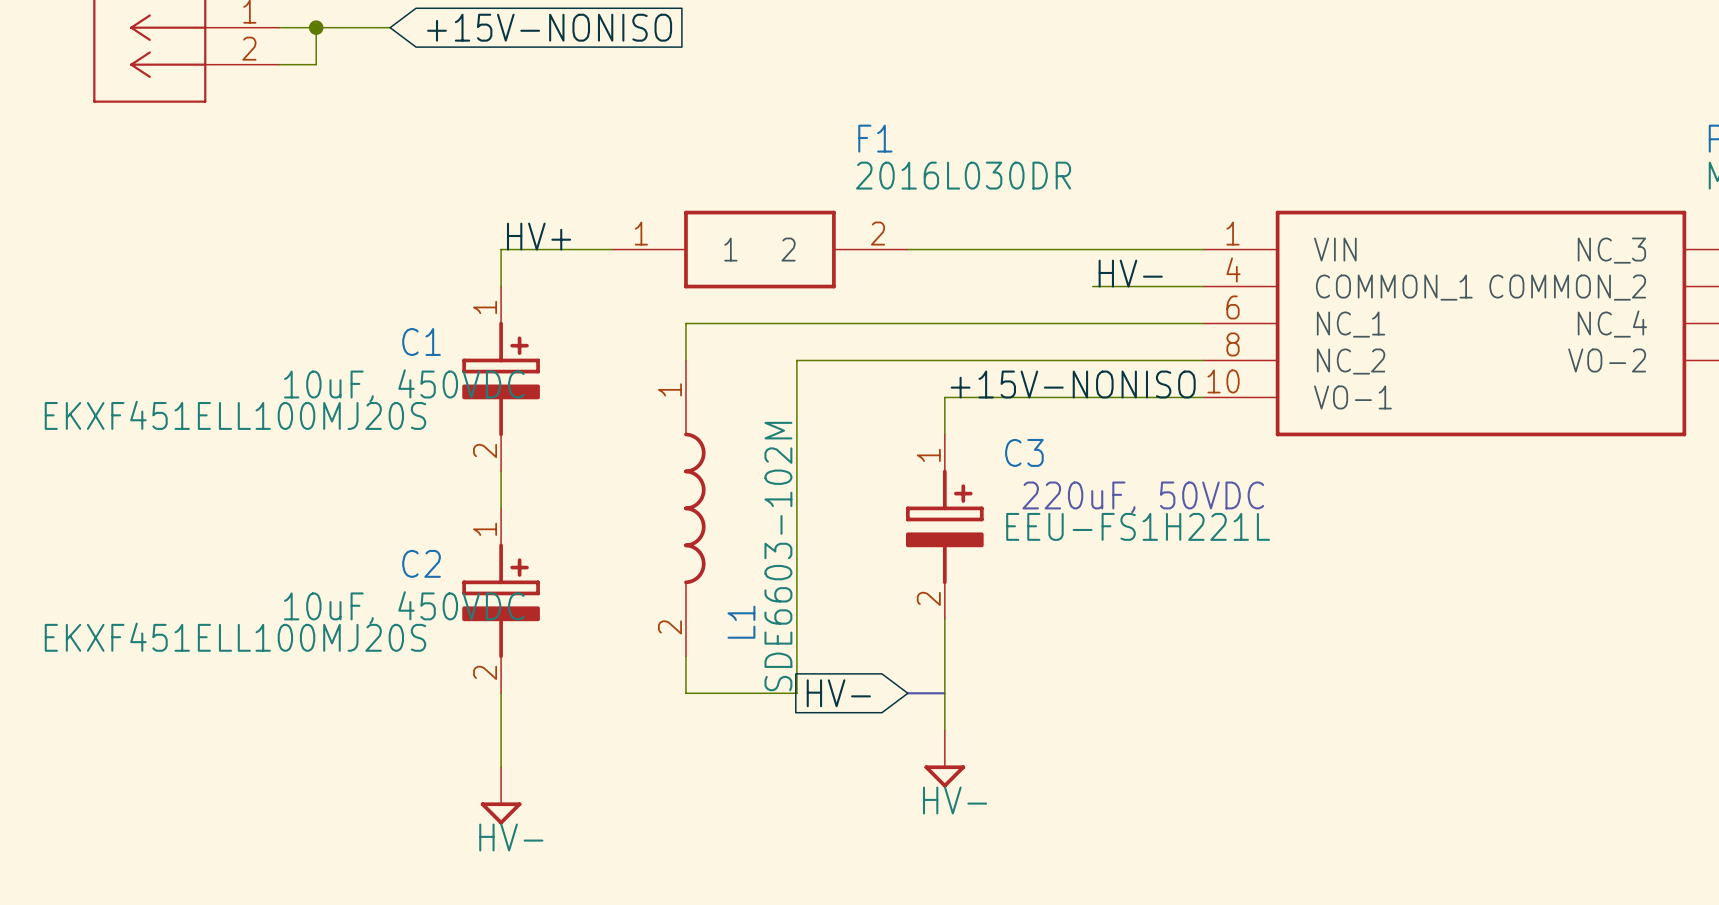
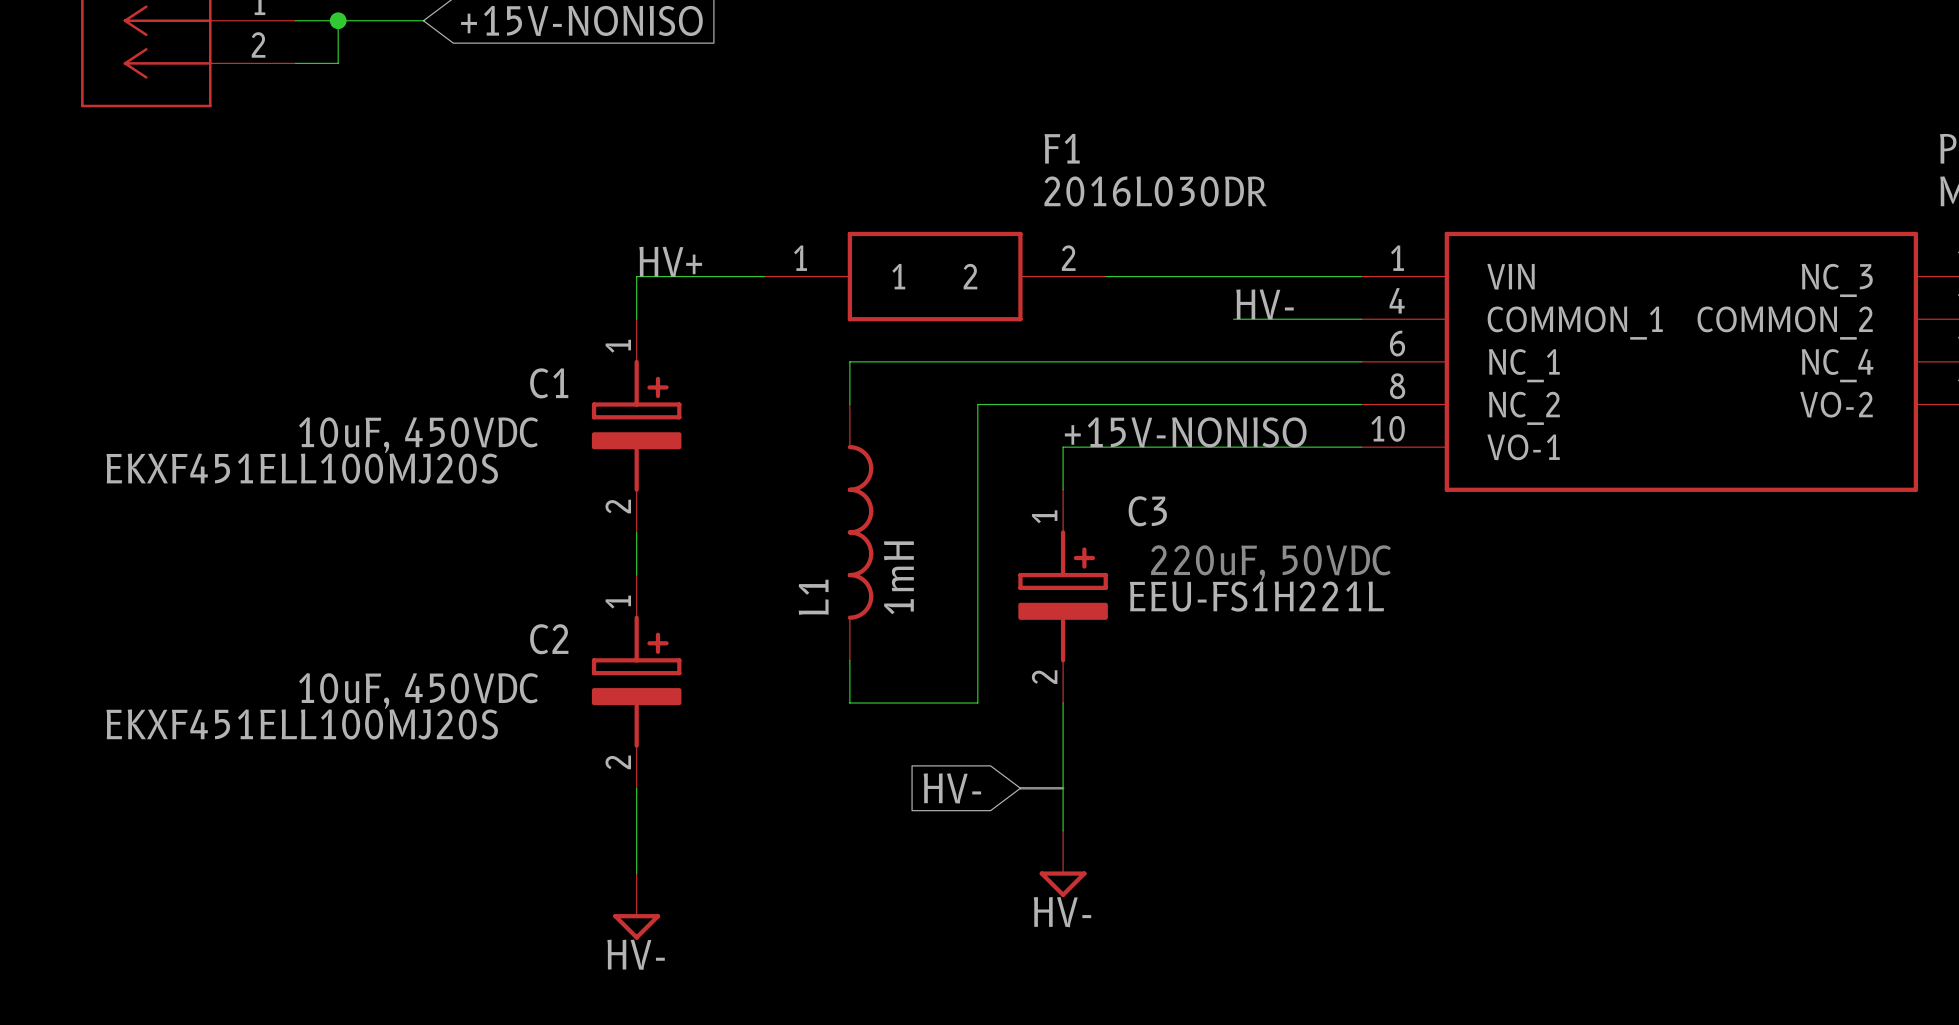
label position: HV+ (539, 236) -> HV+ (670, 261)
wire: (575, 249) (501, 249) (501, 286) -> (636, 276) (636, 319)
F1 position: (759, 249) -> (935, 276)
wire: (759, 323) (685, 323) (685, 360) -> (849, 361) (849, 404)
L1 symbol: [684, 360, 706, 657] -> [847, 404, 874, 661]
wire: (870, 360) (796, 360) (796, 693) (685, 693) (685, 656) -> (977, 404) (977, 702) (849, 702) (849, 660)
C1 position: (501, 378) -> (636, 425)
wire: (501, 471) (501, 508) -> (636, 532) (636, 575)
L1 value: SDE6603-102M (778, 556) -> 1mH (898, 577)
C2 position: (501, 600) -> (636, 681)
L1 name position: L1 (741, 622) -> L1 (813, 597)
wire: (501, 693) (501, 767) -> (636, 788) (636, 873)
power symbol position: HV- (501, 795) -> HV- (636, 906)

